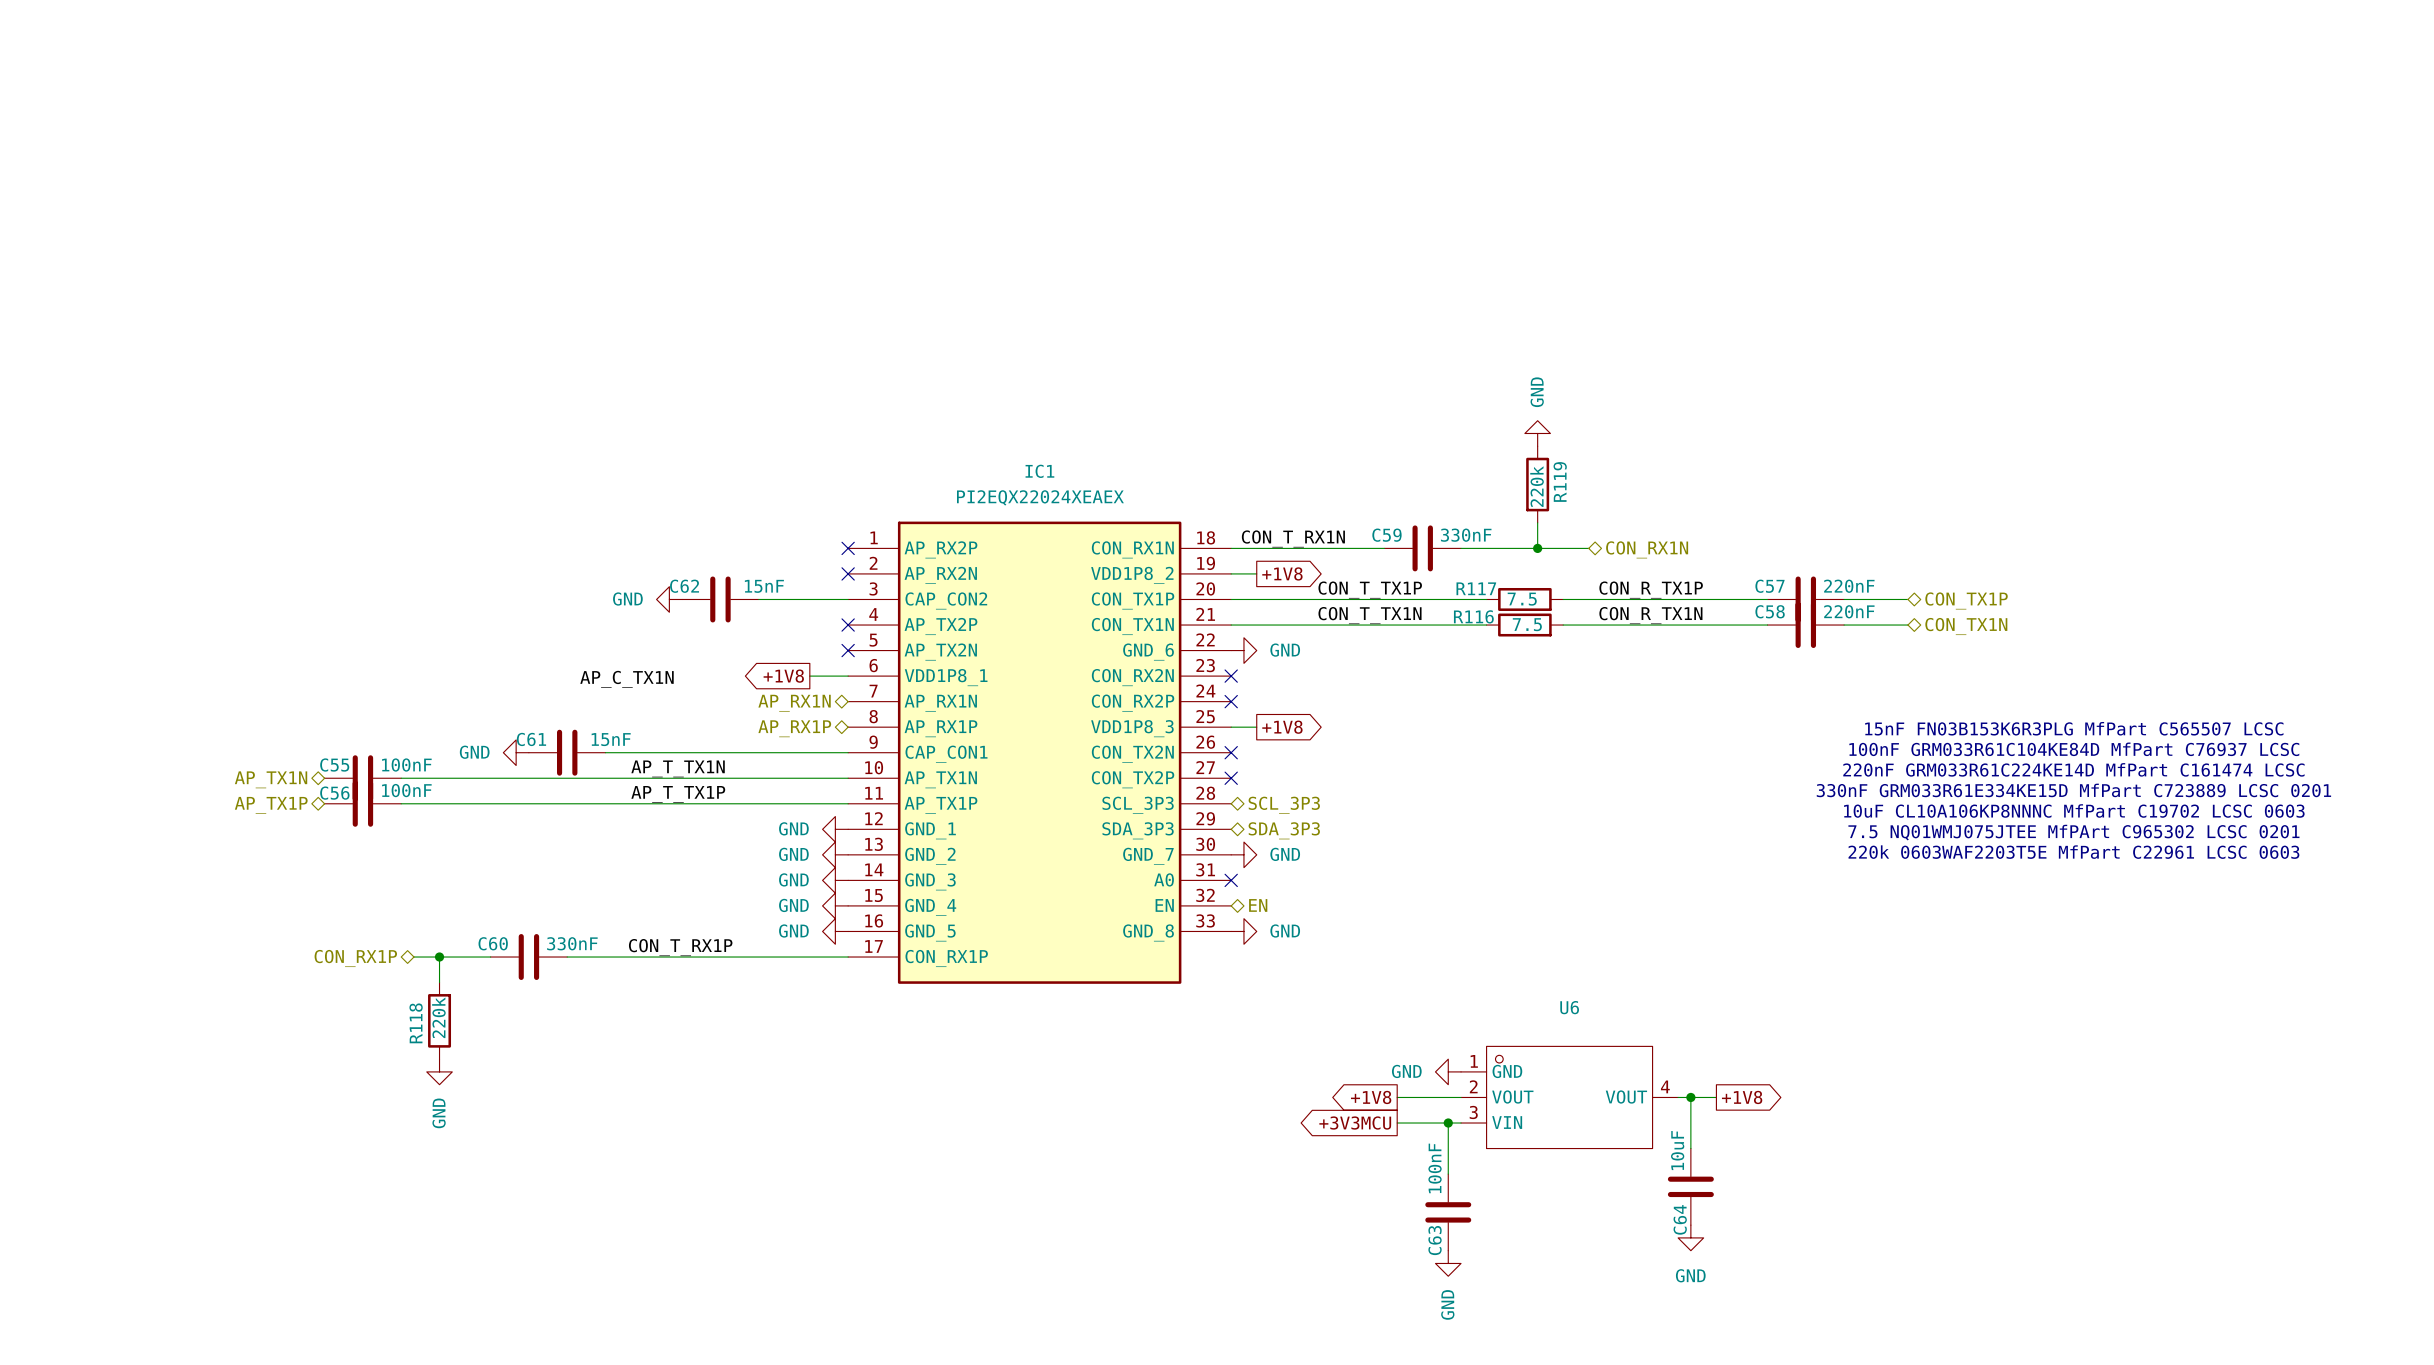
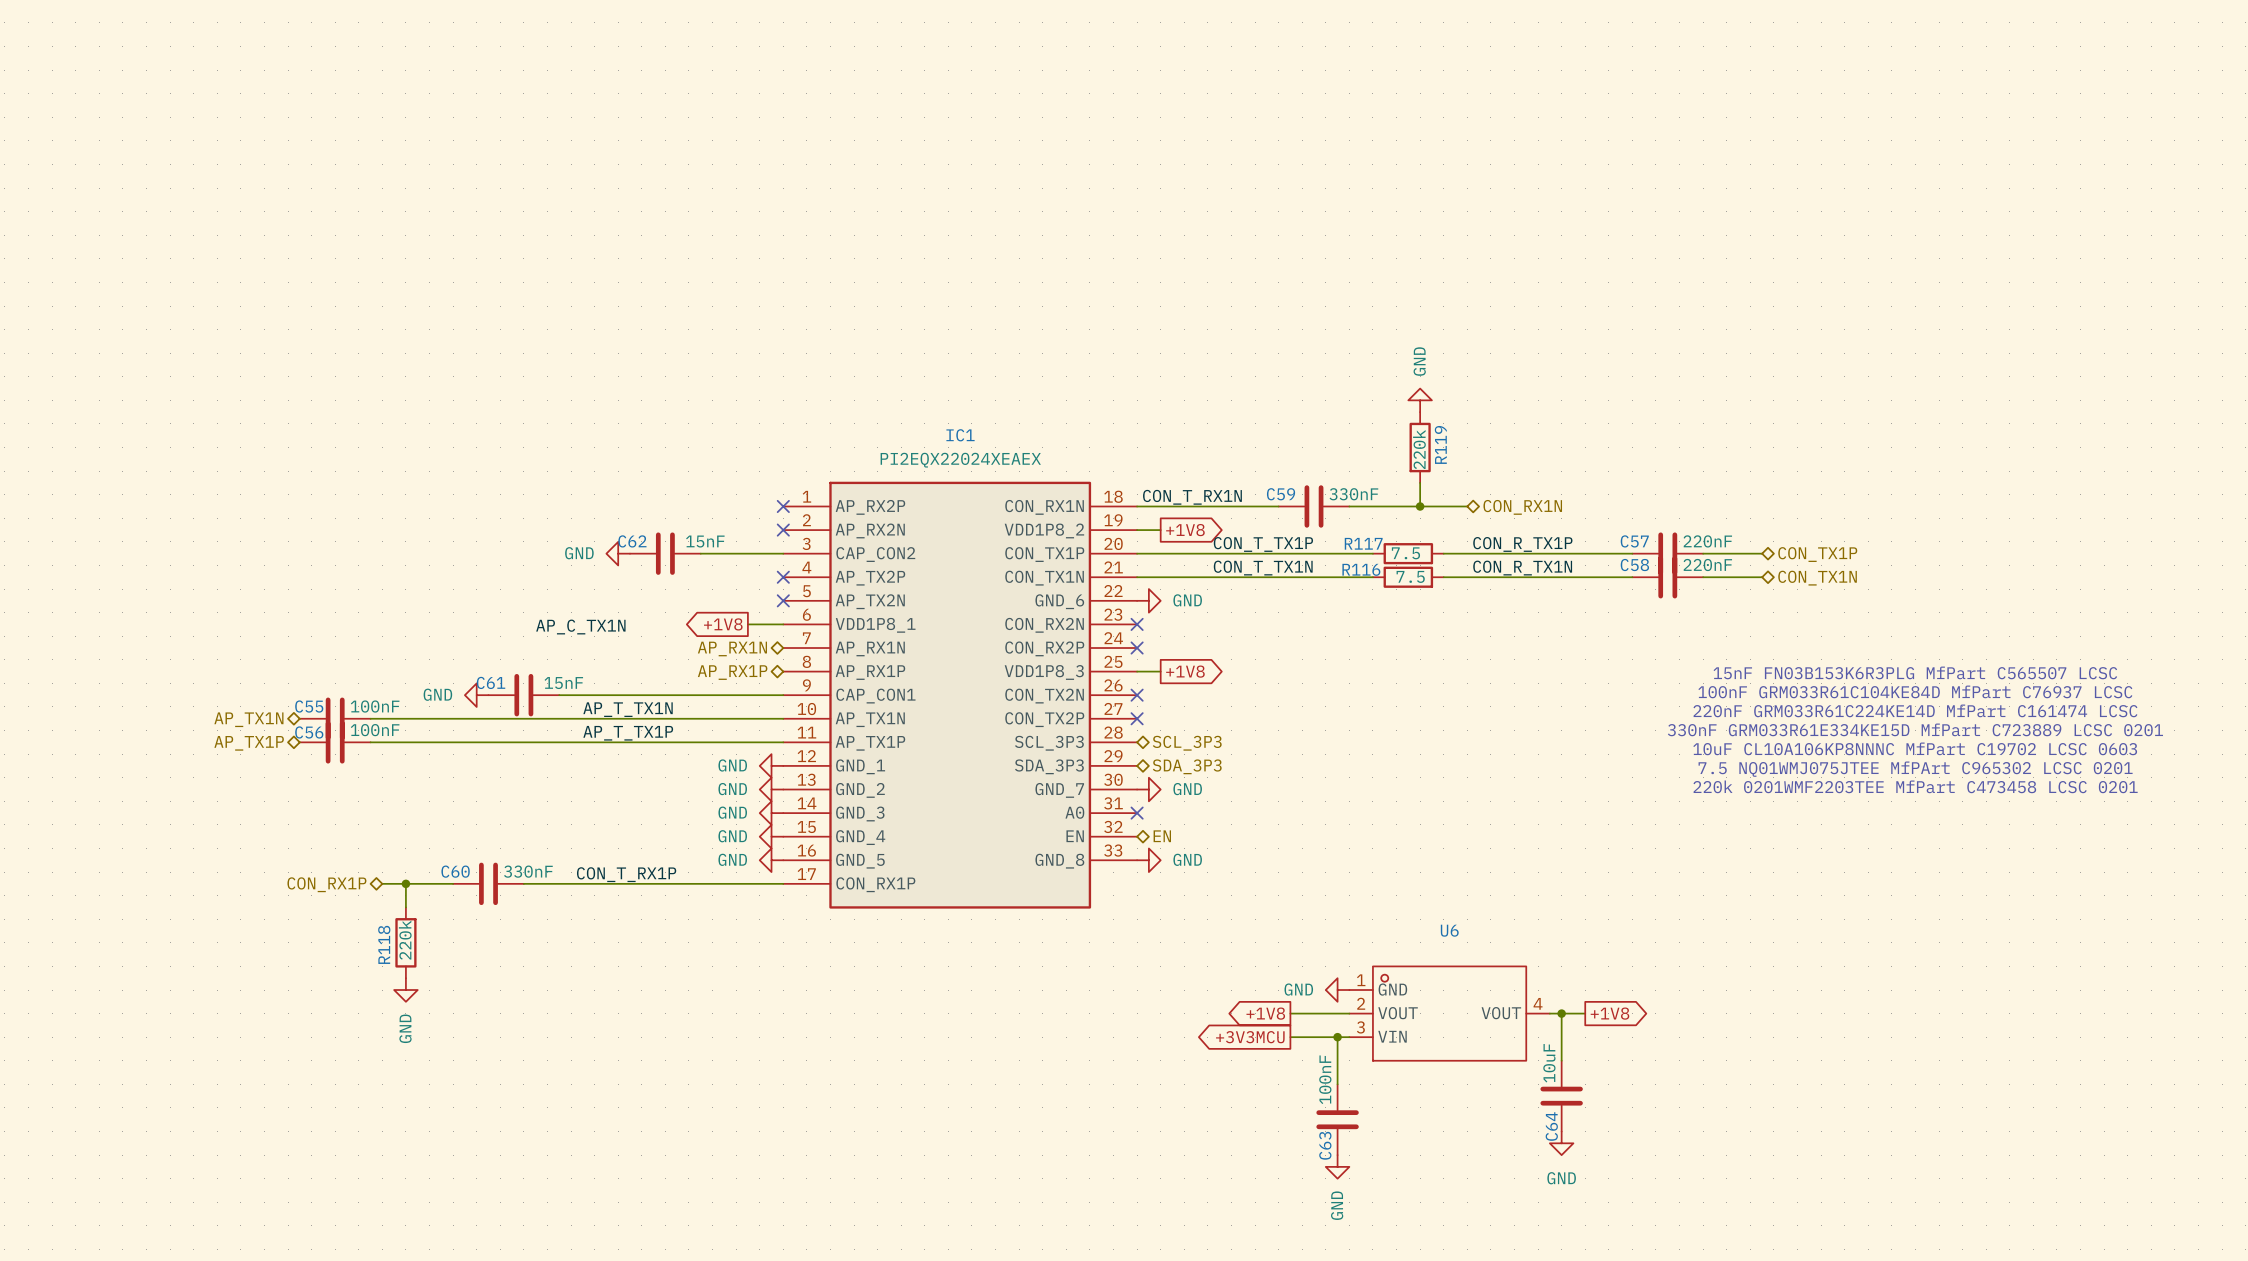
text: 220k 0603WAF2203T5E MfPart C22961 LCSC 0603 (2073, 852) -> 220k 0201WMF2203TEE MfPart C473458 LCSC 0201 (1915, 786)

